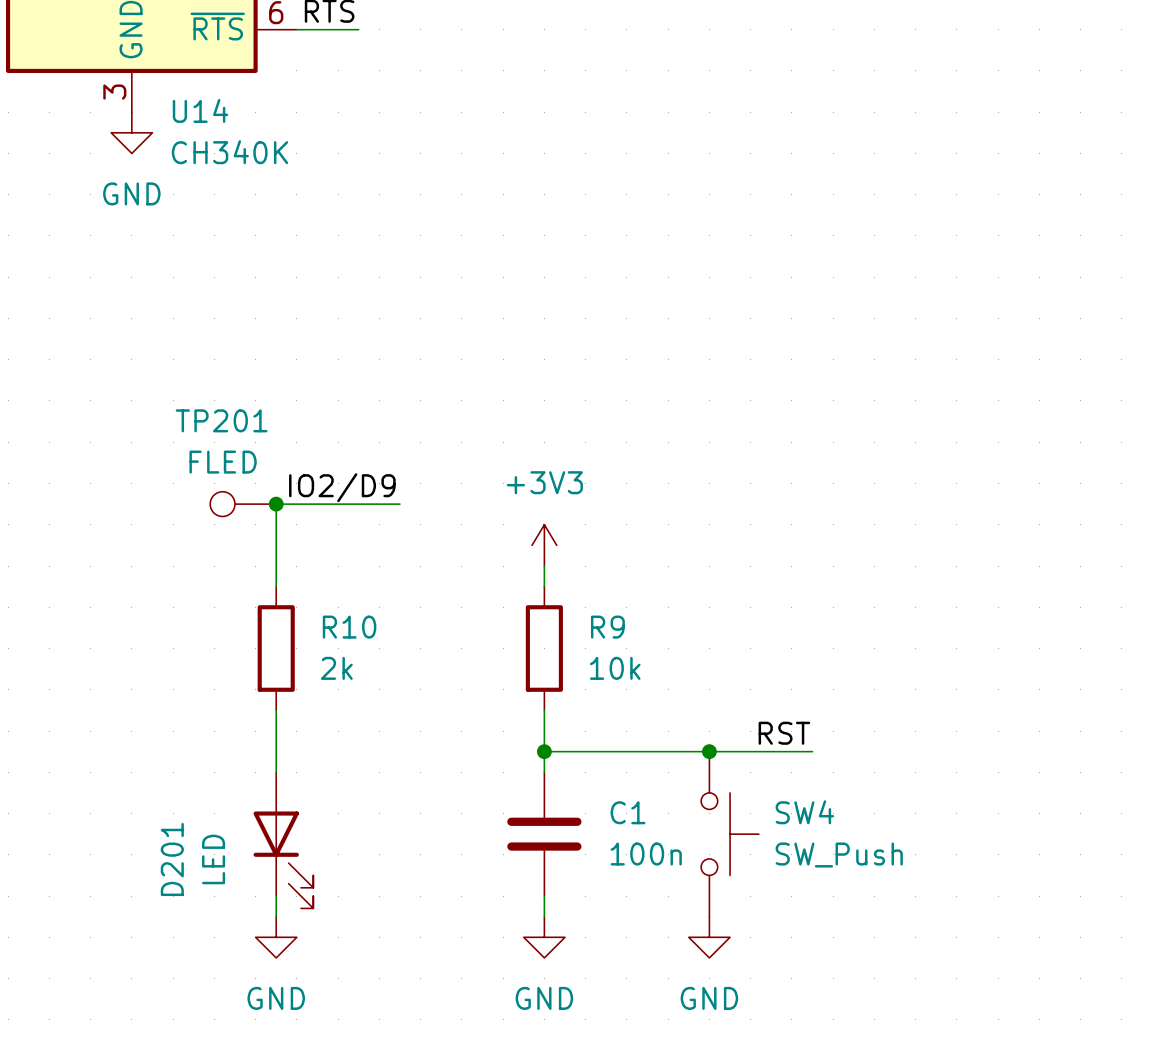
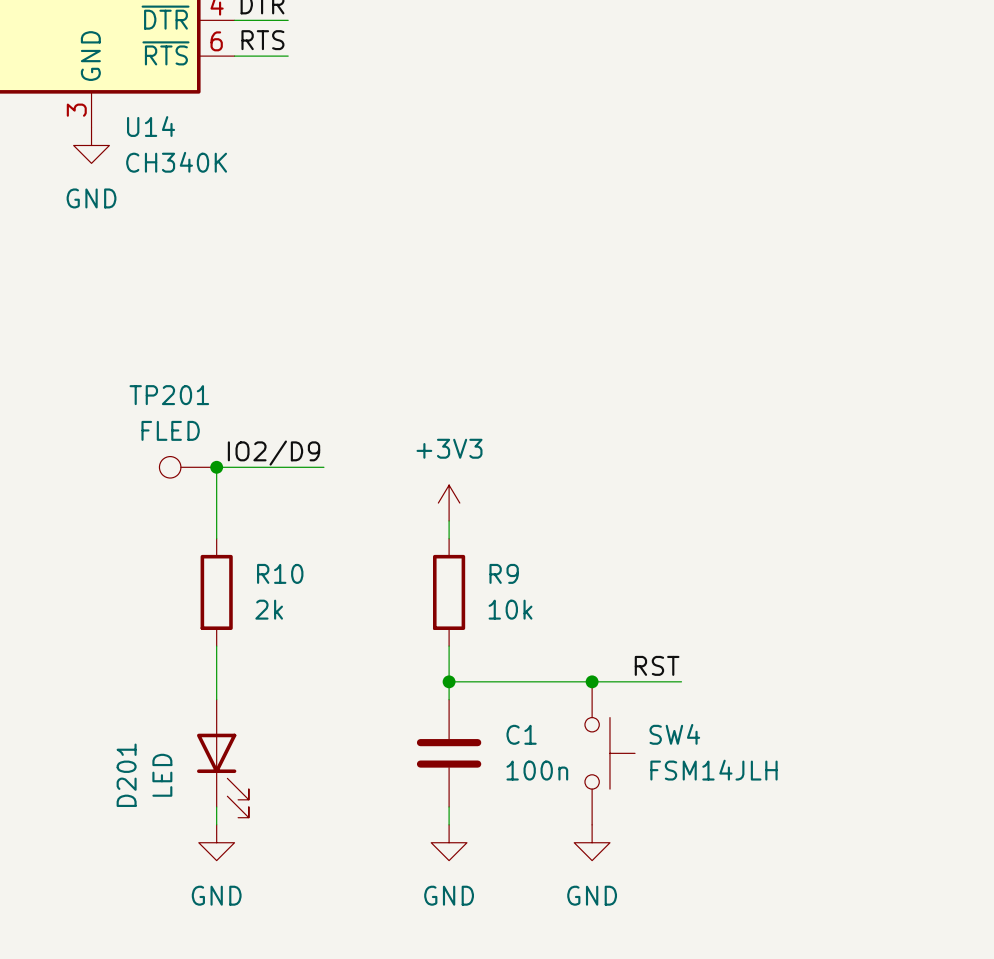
SW4 value: SW_Push (839, 855) -> FSM14JLH (713, 770)

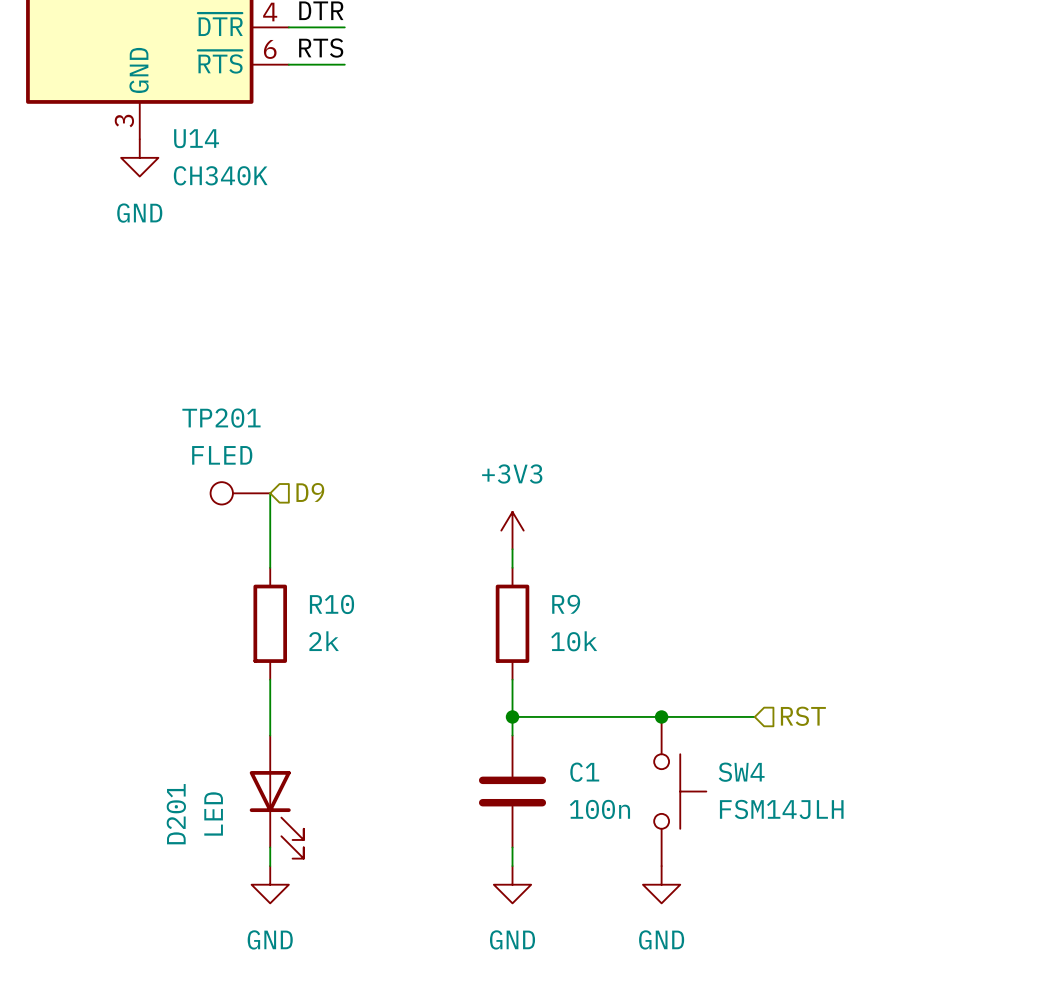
label: IO2/D9 (274, 453) -> none
hierarchical label: none -> D9 (310, 492)
wire: (216, 467) (323, 467) -> none
junction: (216, 467) -> none
label: RST (657, 665) -> none
hierarchical label: none -> RST (803, 716)

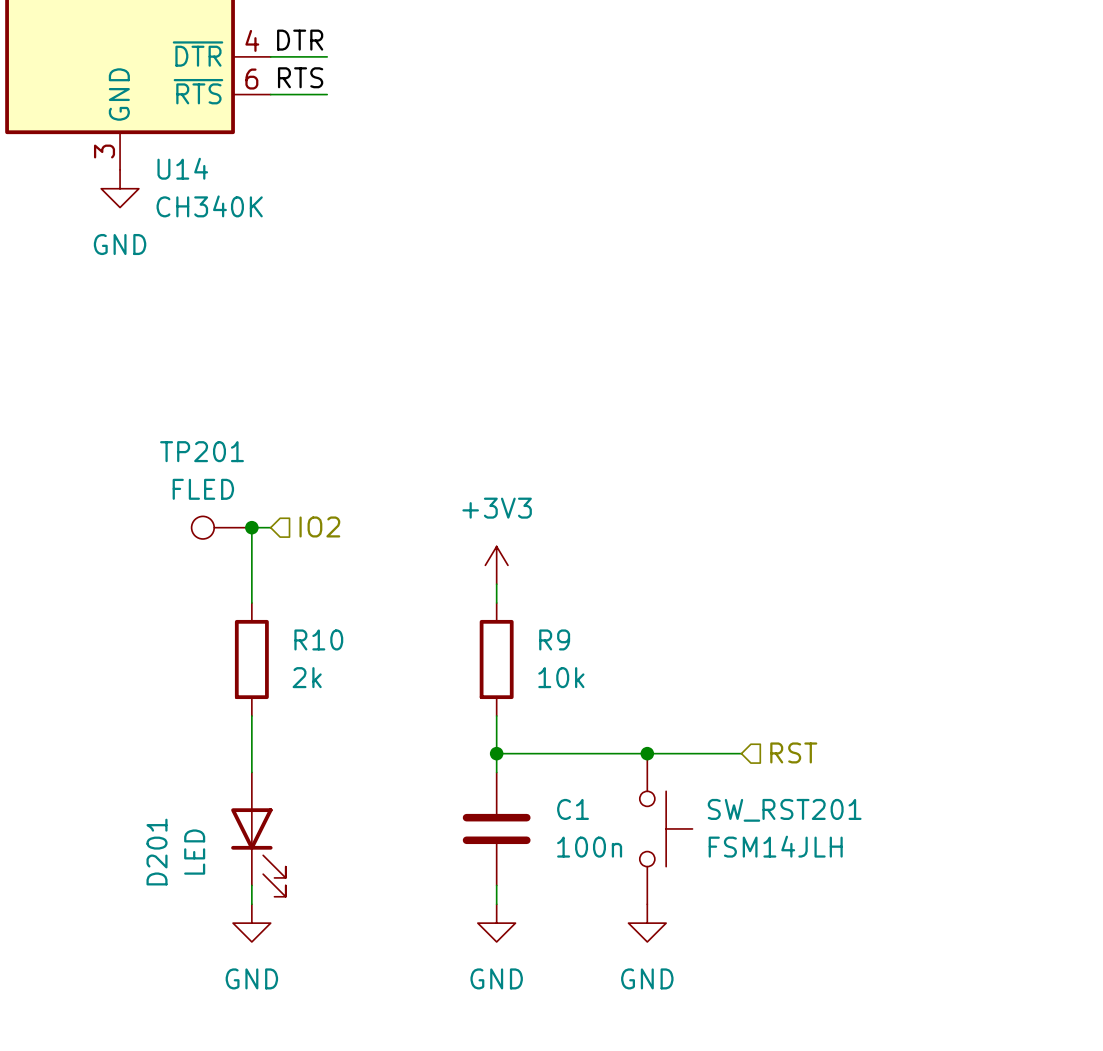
hierarchical label: D9 (310, 492) -> none
hierarchical label: none -> IO2 (319, 526)
wire: none -> (251, 527) (270, 527)
junction: none -> (251, 527)
SW4 name: SW4 (741, 772) -> SW_RST201 (784, 810)

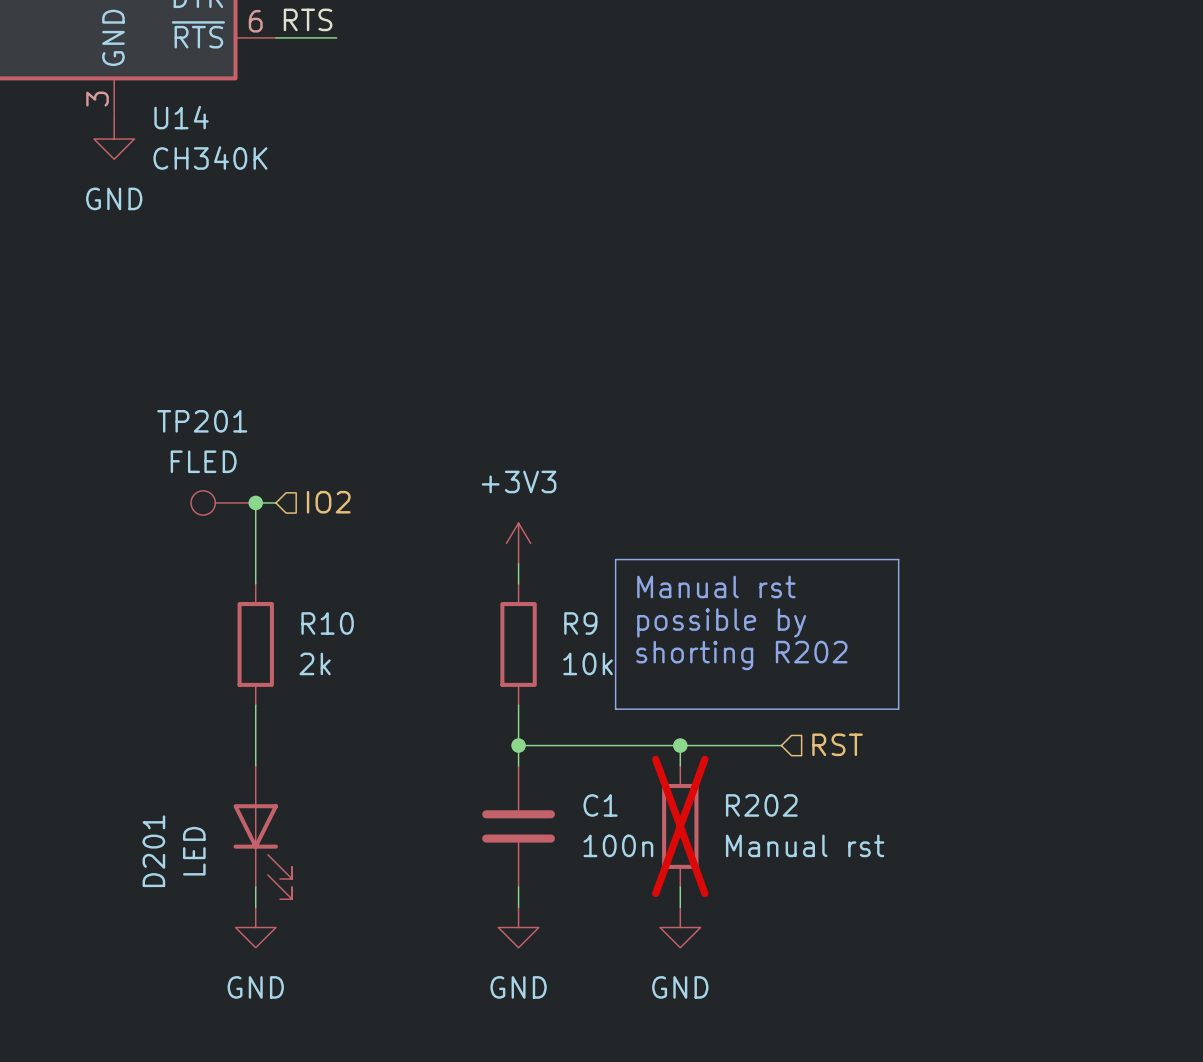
line: none -> (615, 559) (898, 559) (898, 709) (615, 709) (615, 559)
text: none -> Manual rst (716, 587)
text: none -> possible by (721, 622)
text: none -> shorting R202 (741, 655)
R202: none -> Manual rst (680, 826)
SW_RST201: FSM14JLH (666, 828) -> none

